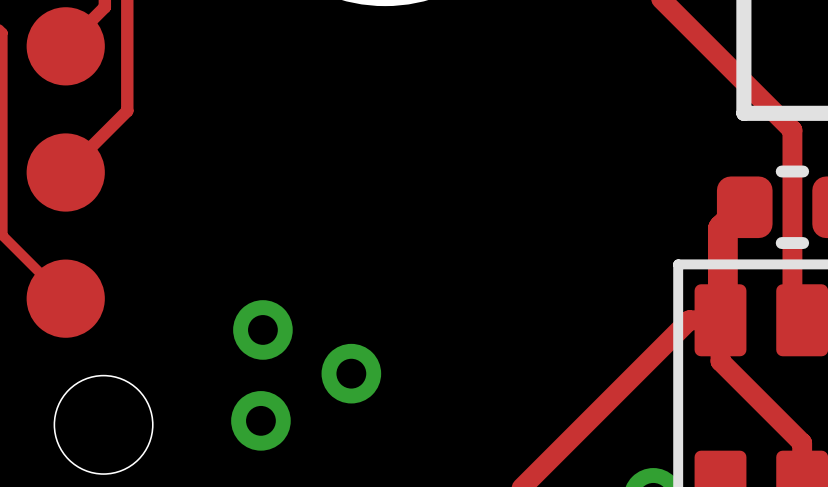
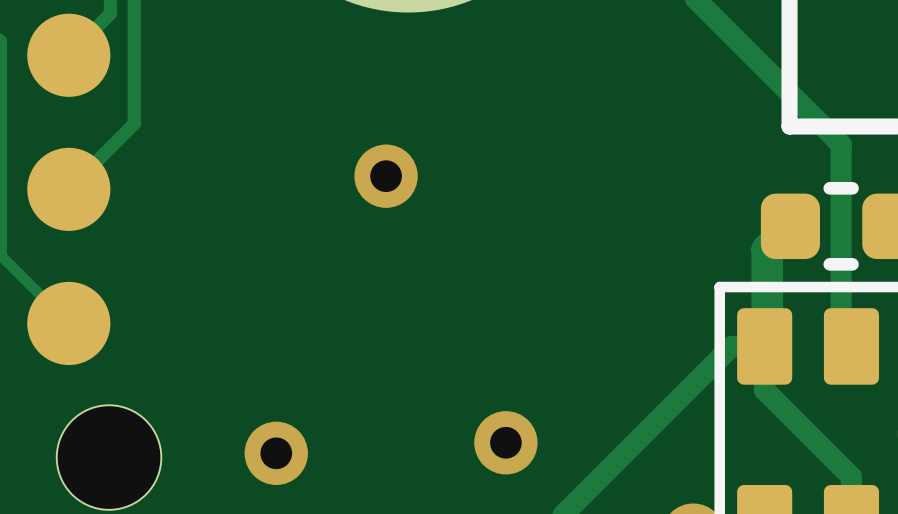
via: none -> (386, 176)
via: (262, 329) -> none
via: (351, 373) -> none
via: none -> (505, 442)

